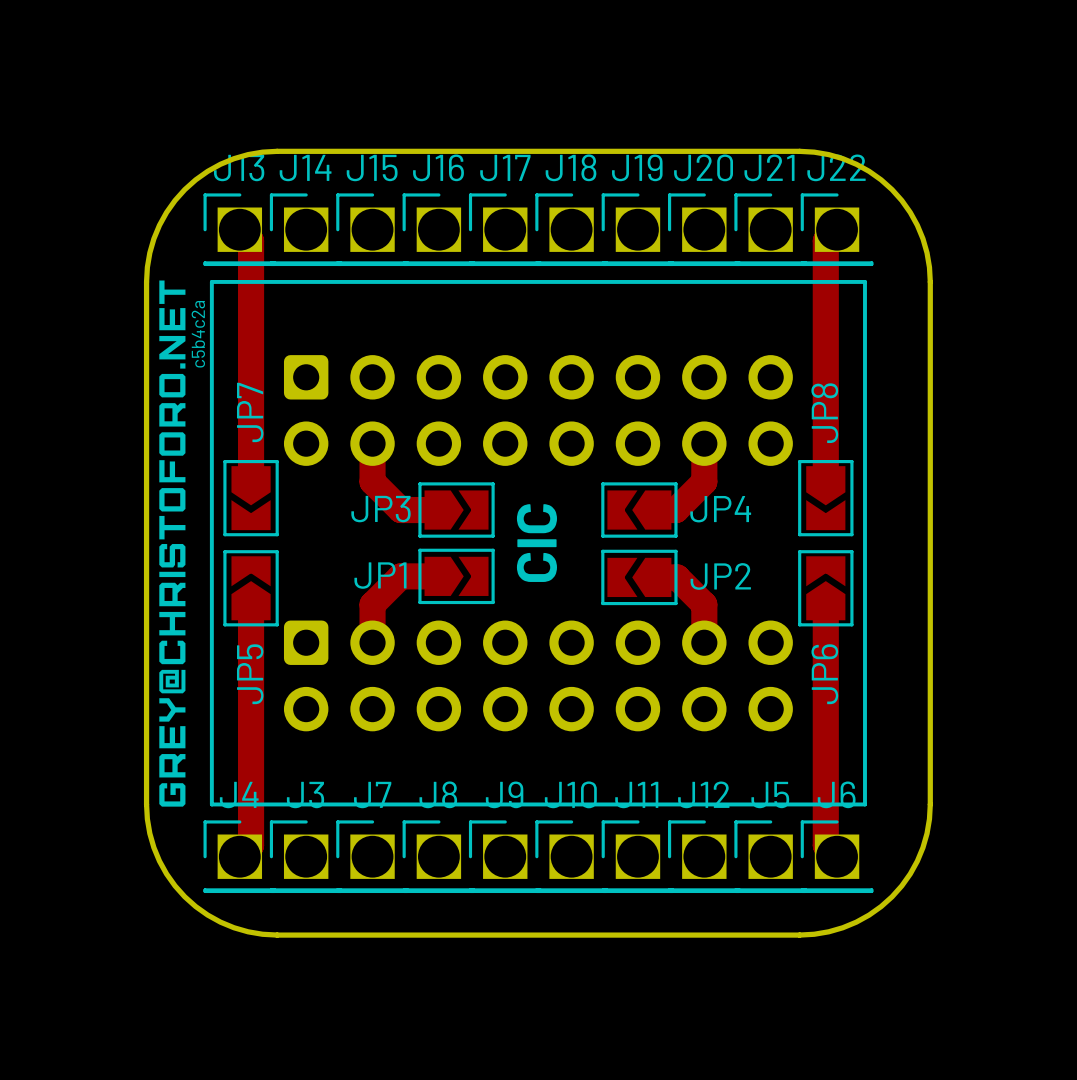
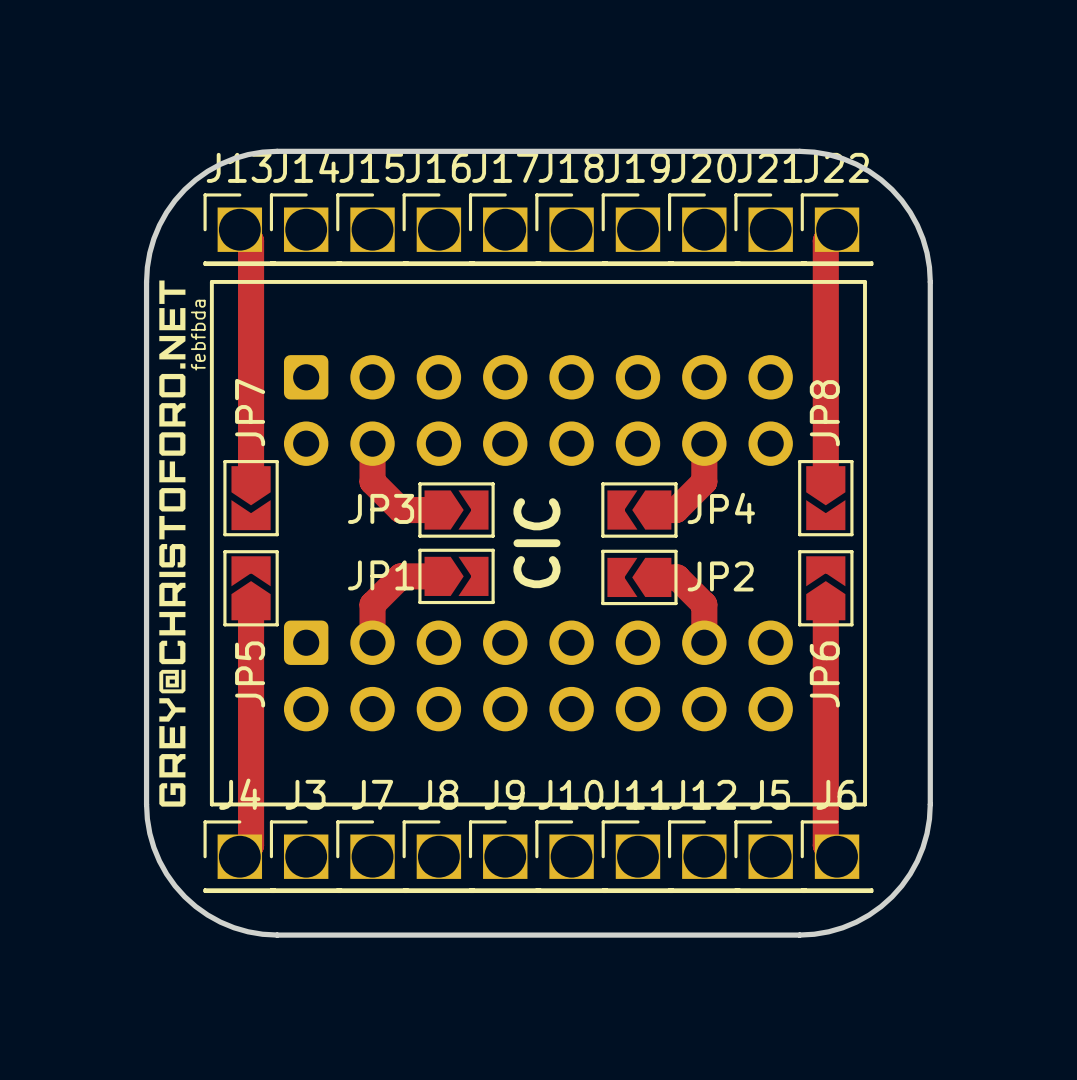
text: c5b4c2a (198, 334) -> febfbda (198, 335)

